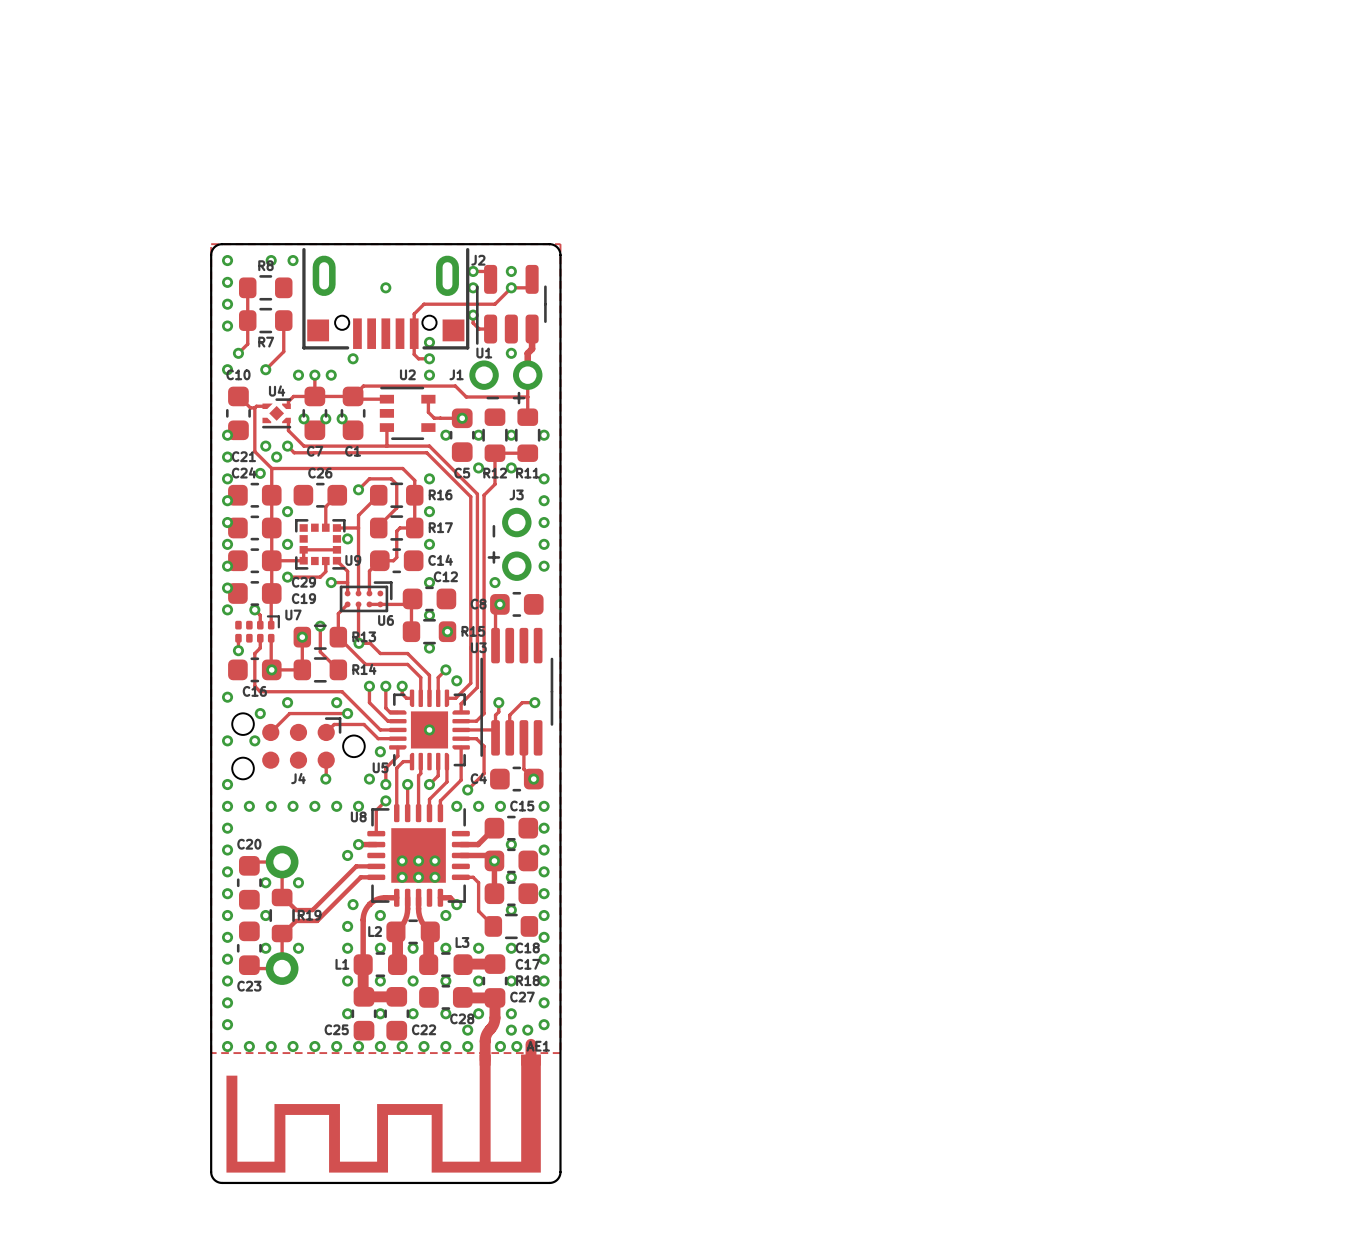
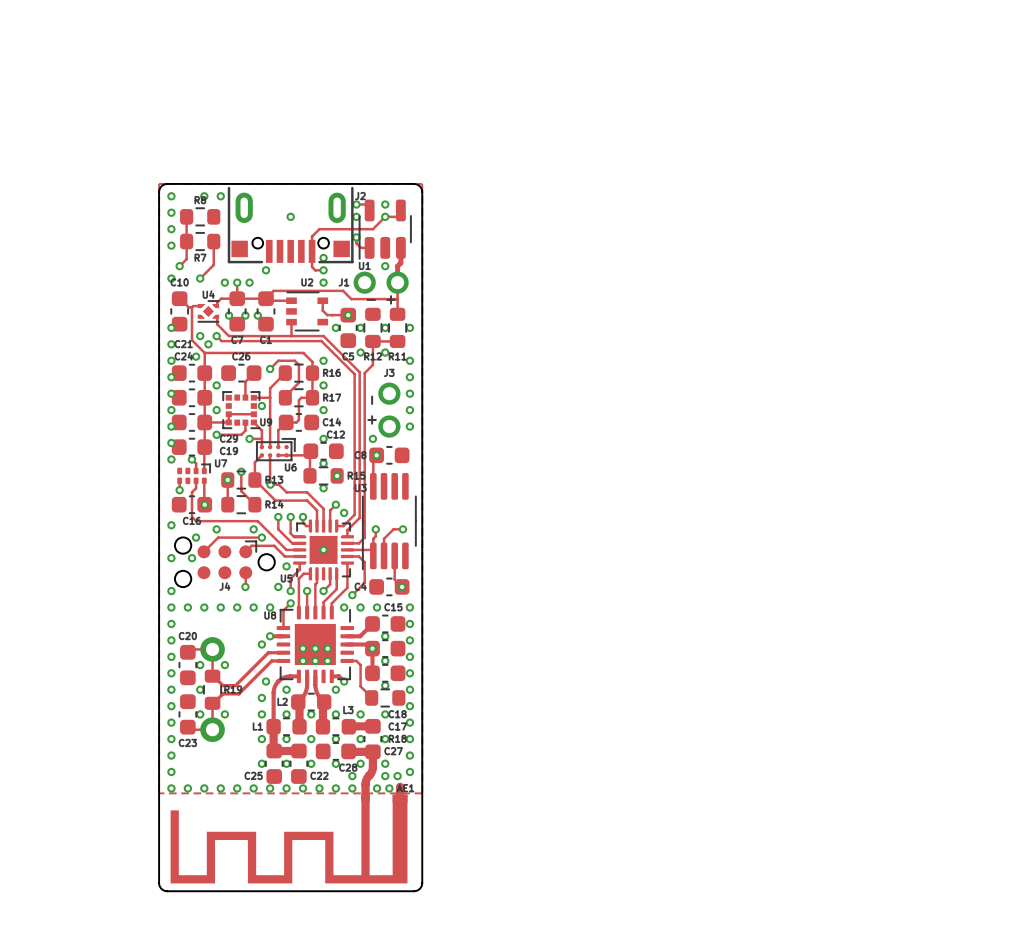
track: (271, 669) (302, 669) -> none

